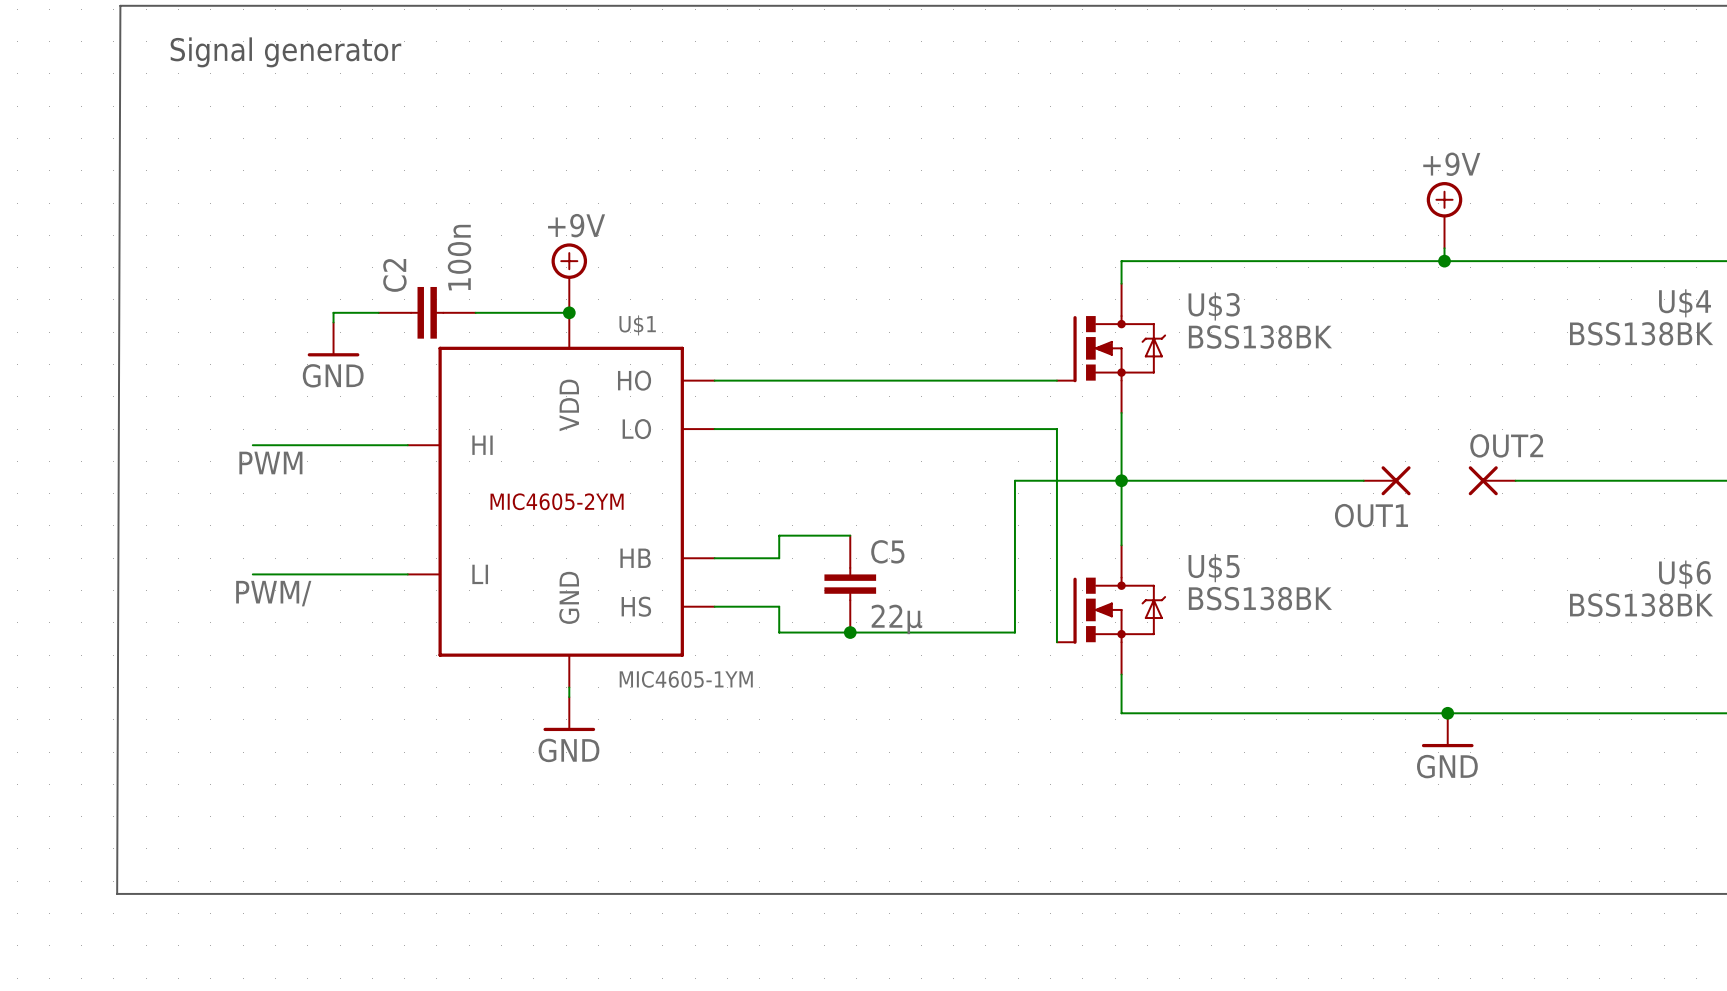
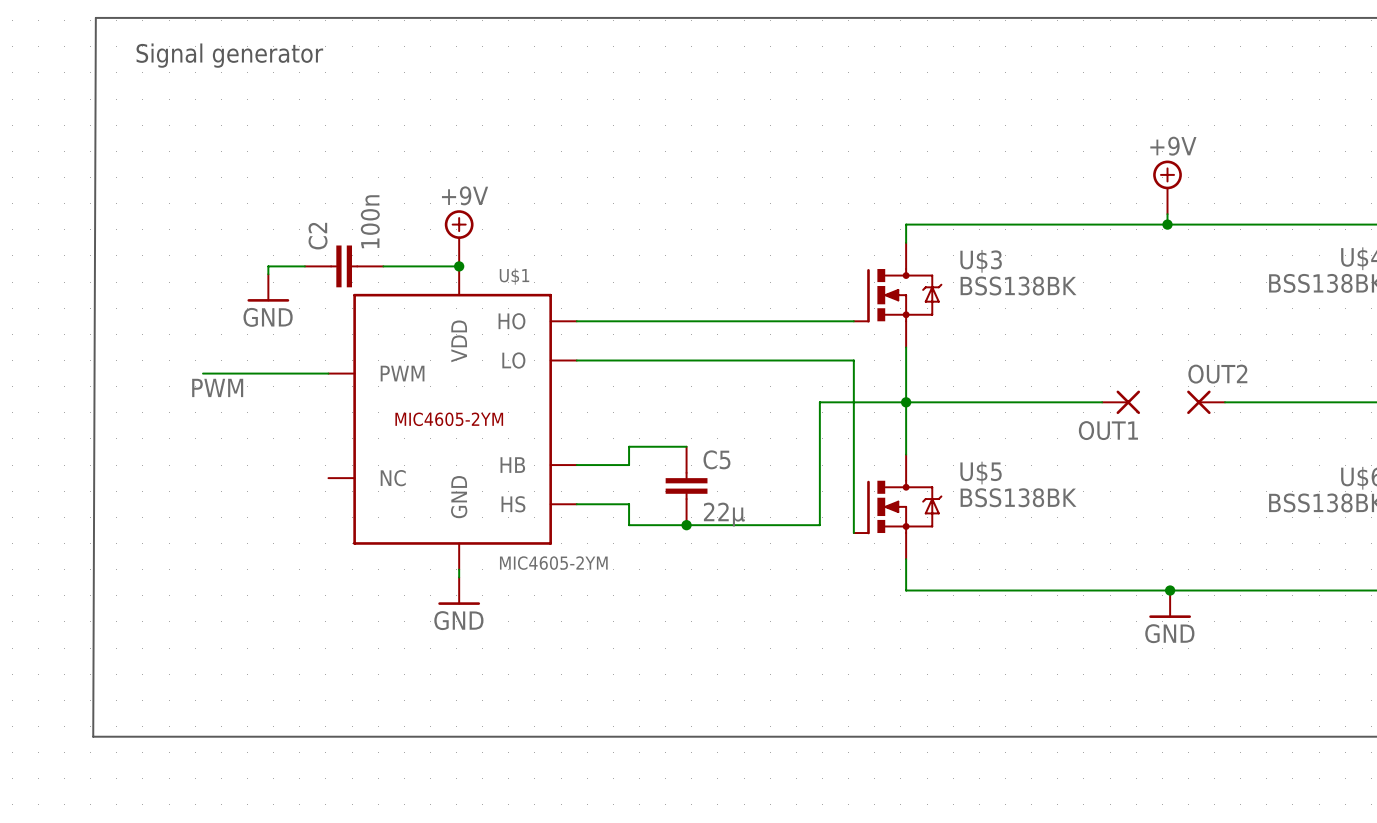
U$1 pin name: HI (482, 445) -> PWM (402, 373)
wire: (252, 574) (407, 574) -> none
U$1 pin name: LI (480, 574) -> NC (393, 478)
label: PWM/ (273, 593) -> none
U$1 value: MIC4605-1YM (686, 679) -> MIC4605-2YM (553, 563)

